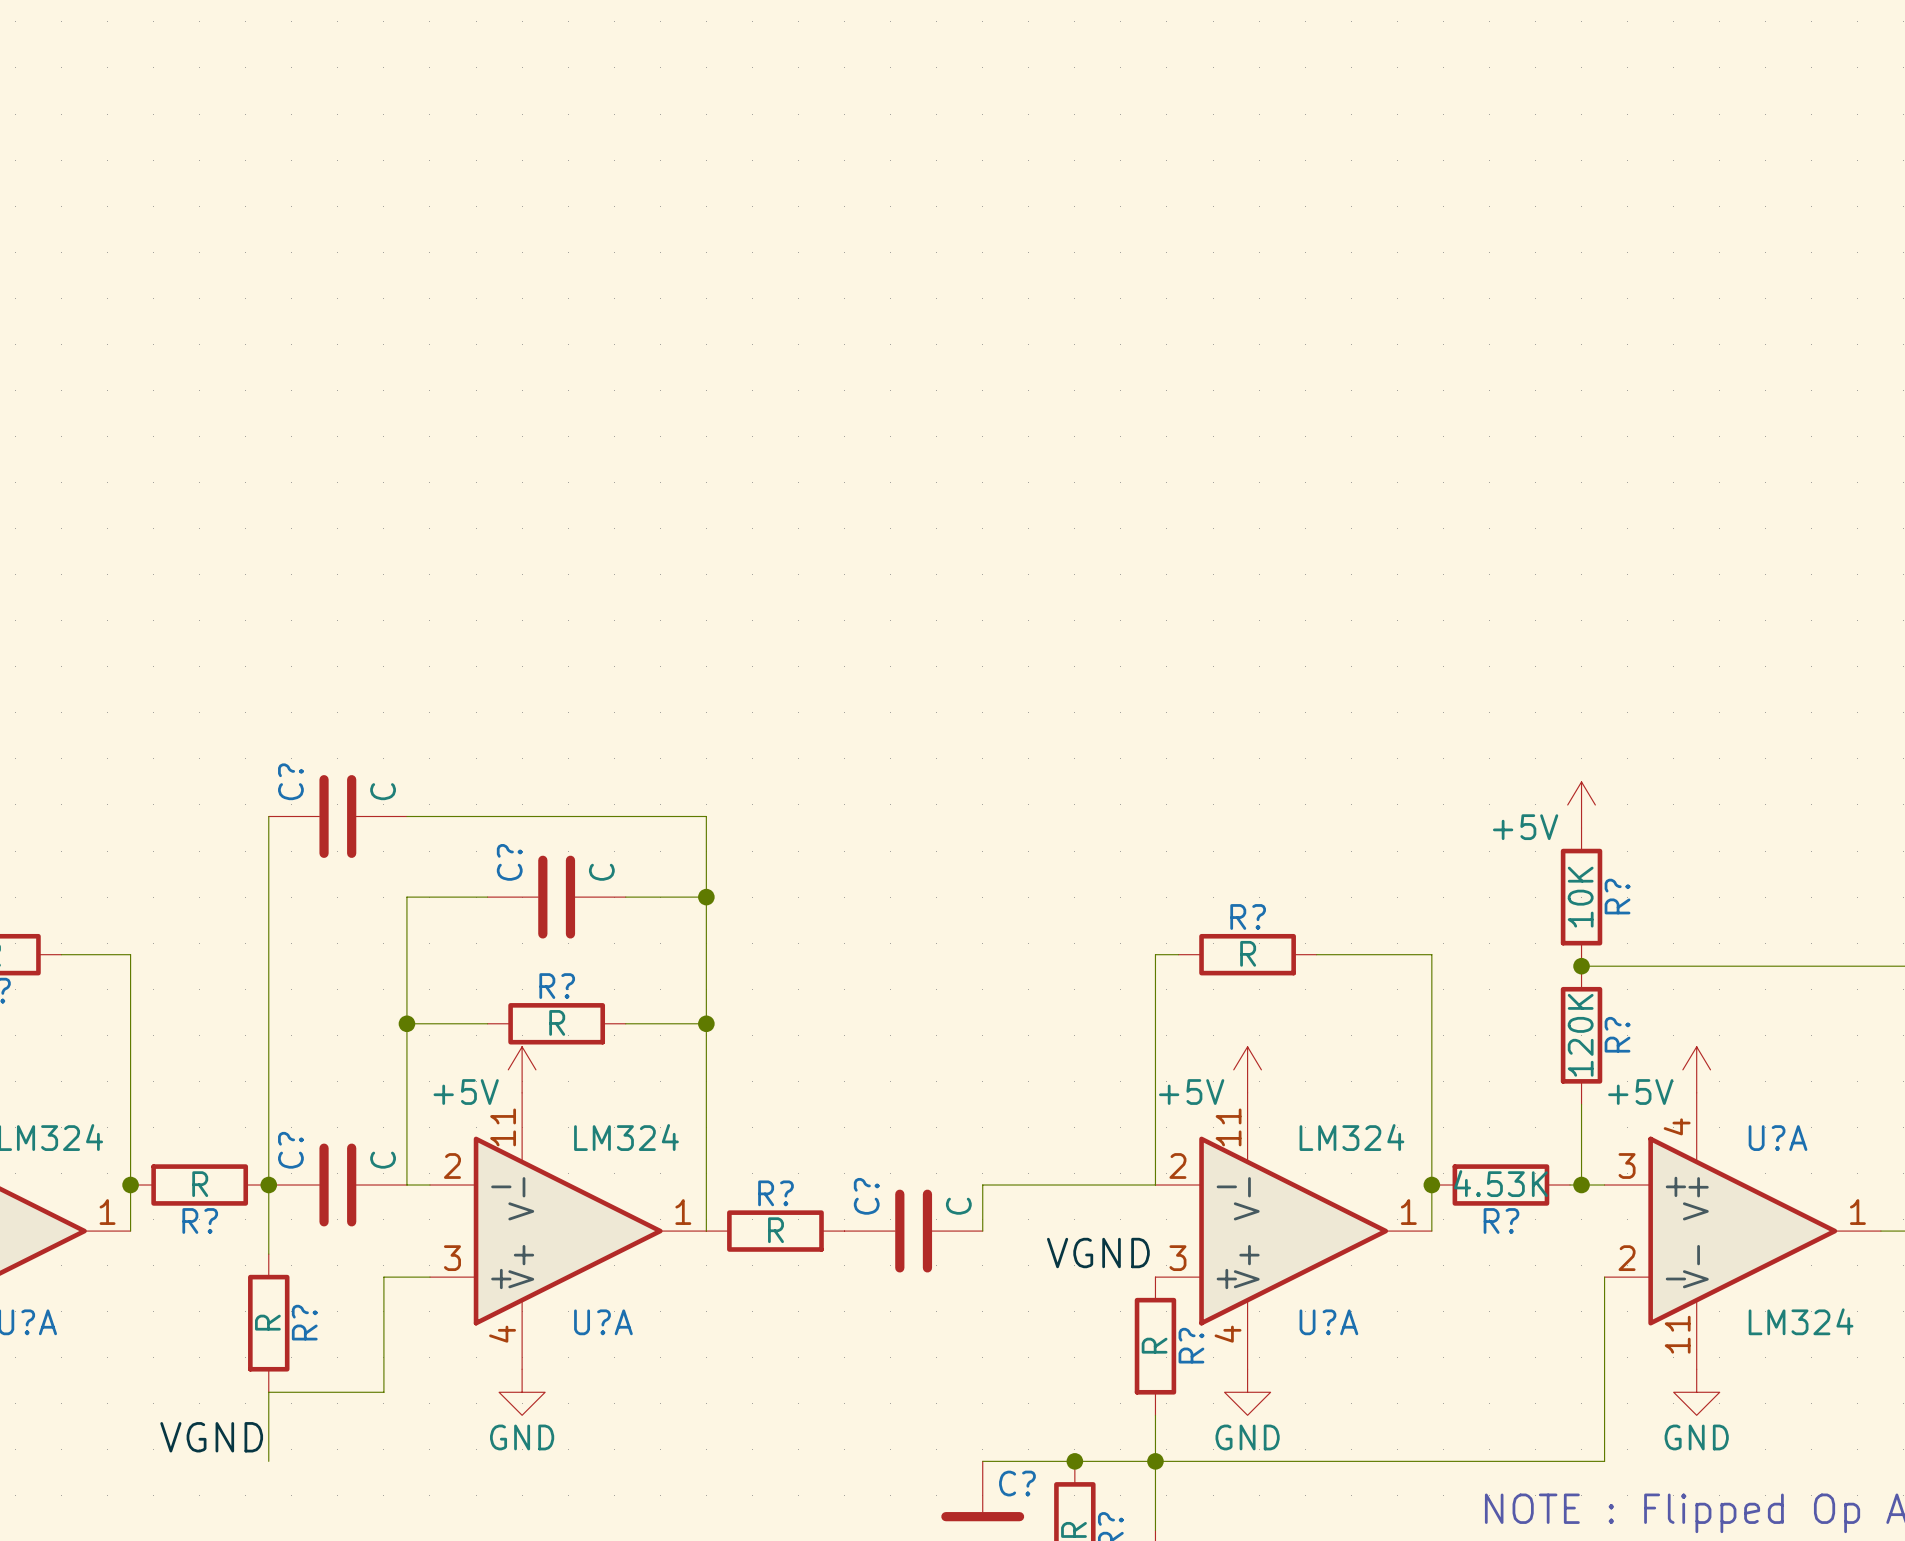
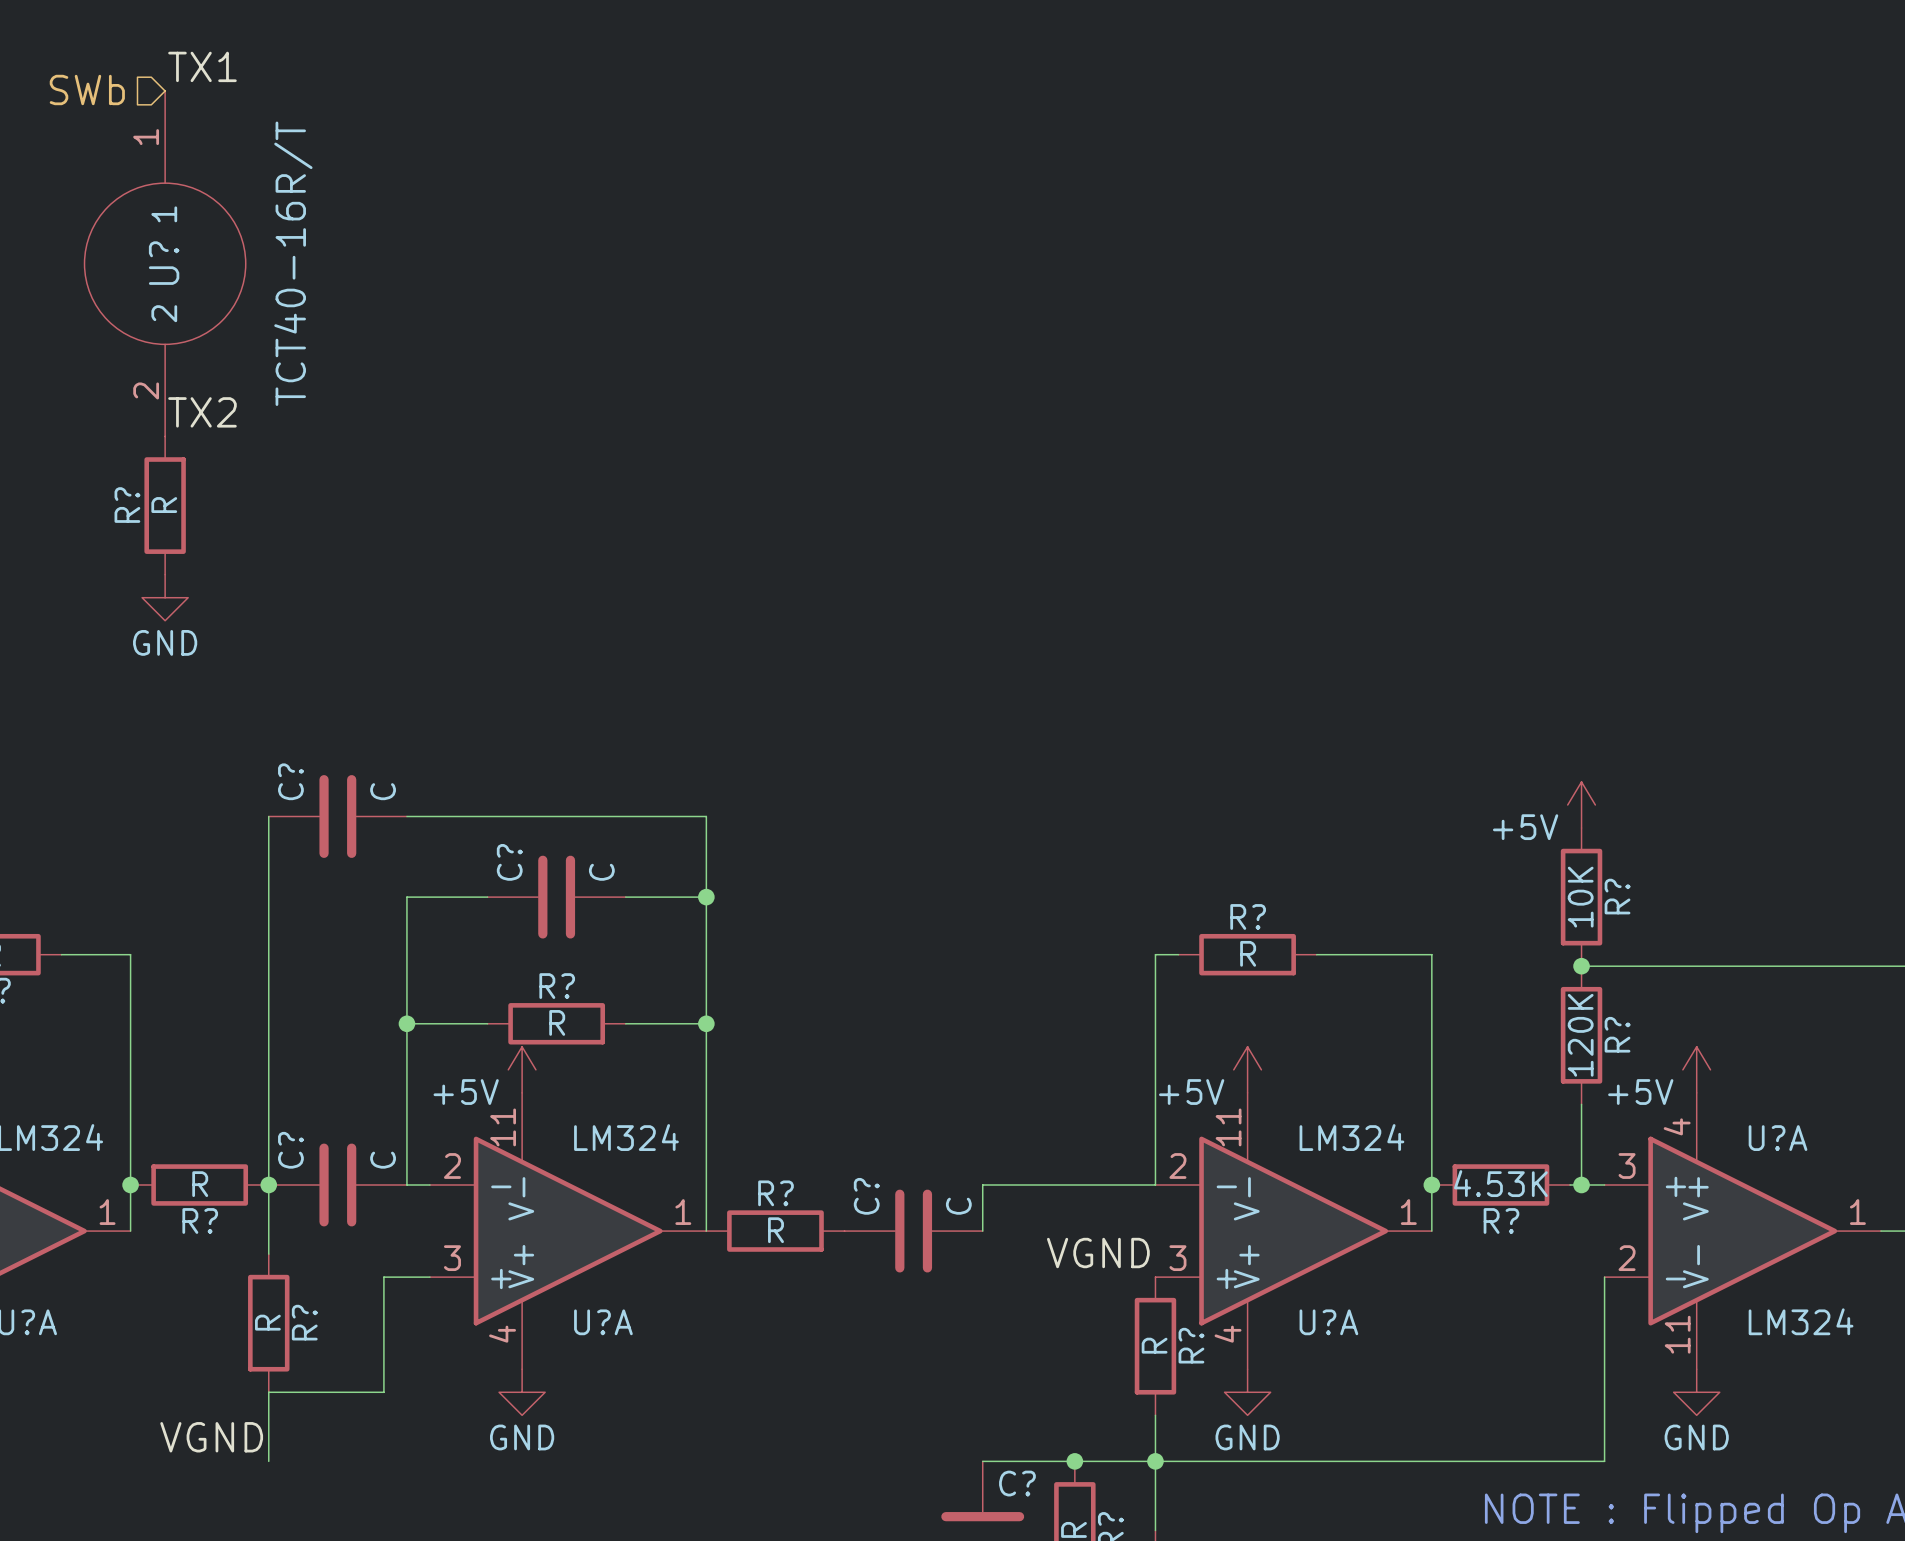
label: none -> TX1 (202, 66)
hierarchical label: none -> SWb (87, 89)
U?: none -> TCT40-16R/T (165, 263)
label: none -> TX2 (202, 412)
R?: none -> R (165, 505)
power symbol: none -> GND (165, 597)

